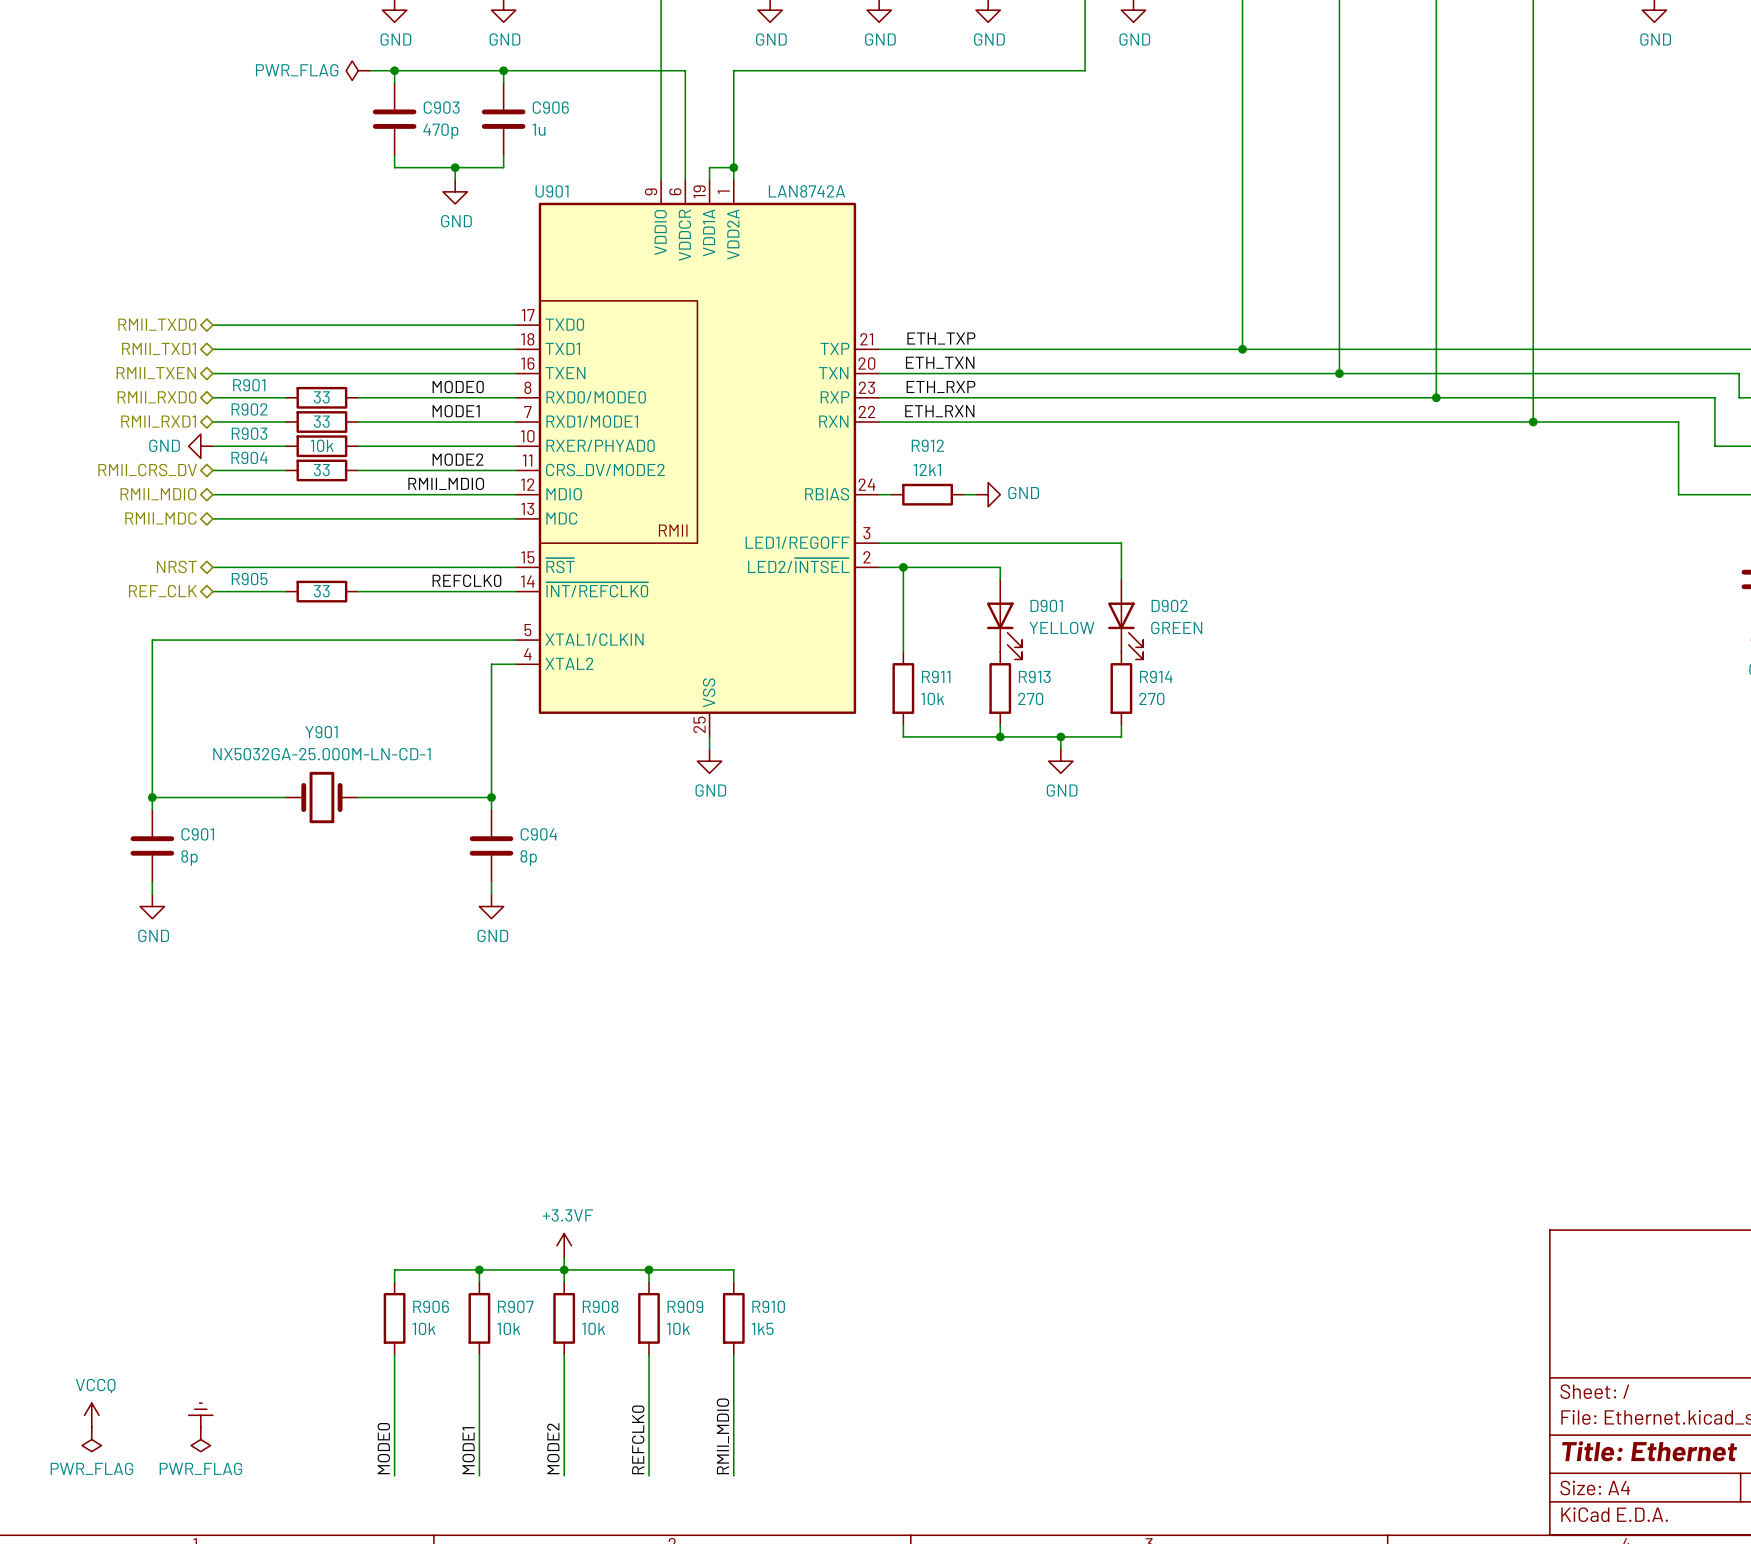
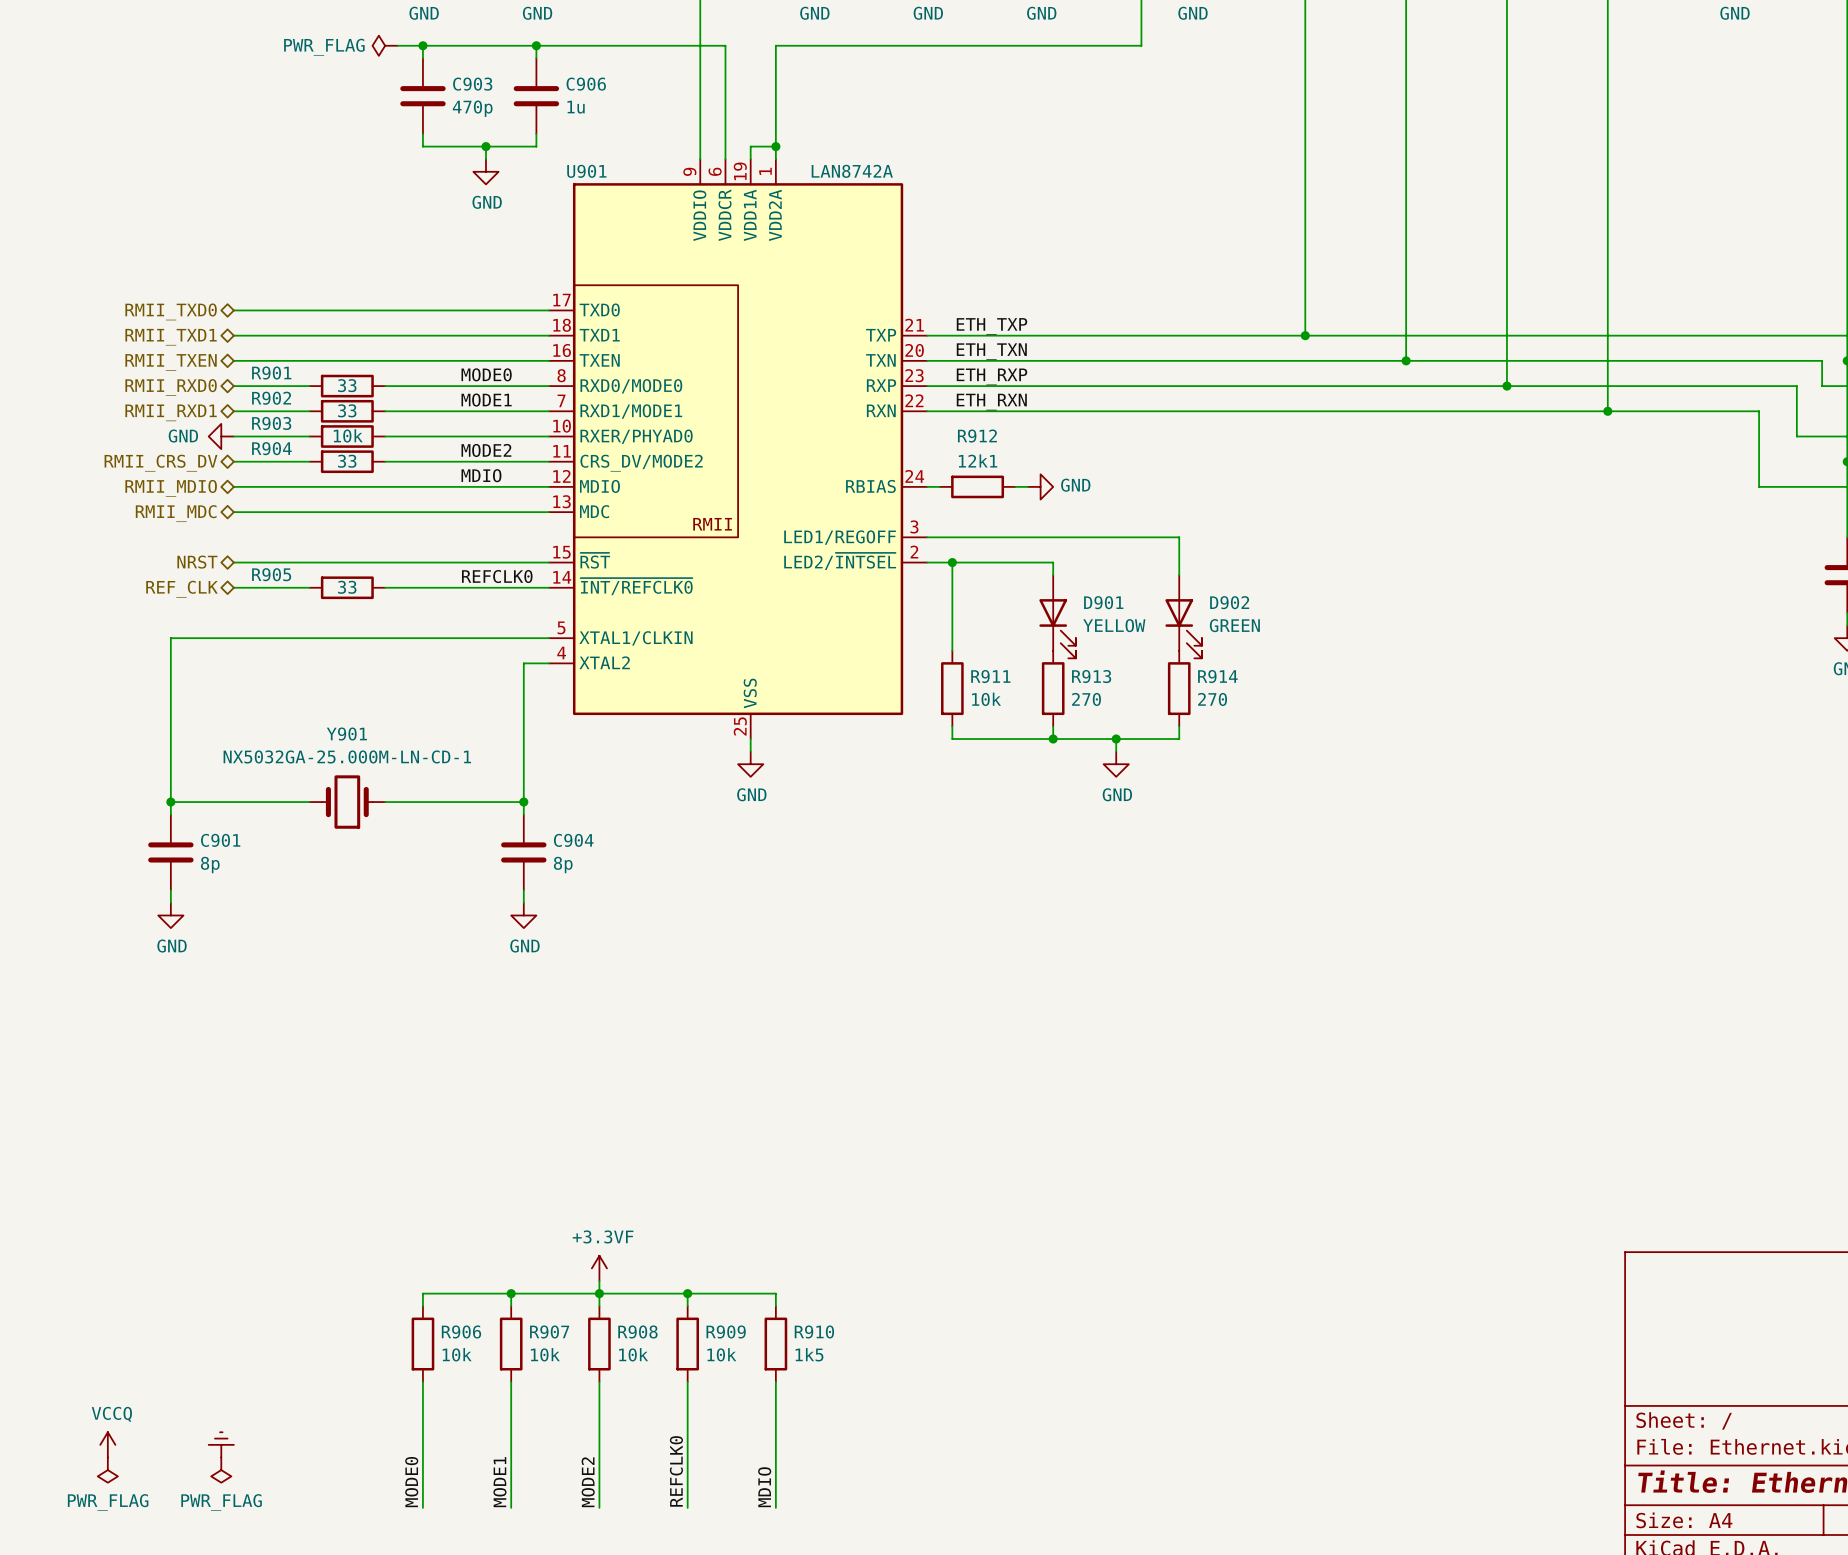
label: RMII_MDIO (446, 483) -> MDIO (481, 475)
label: RMII_MDIO (722, 1436) -> MDIO (764, 1487)

